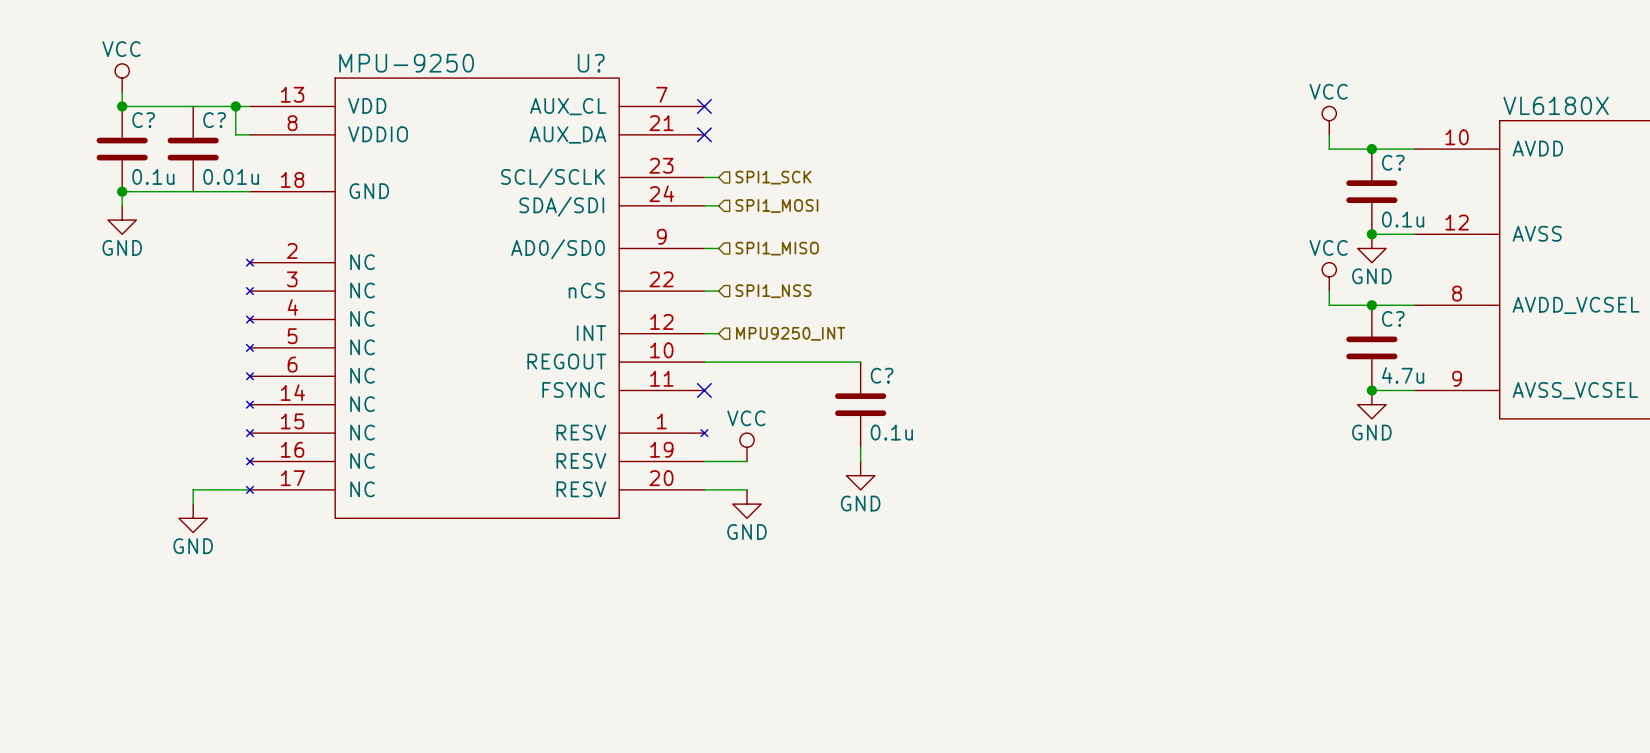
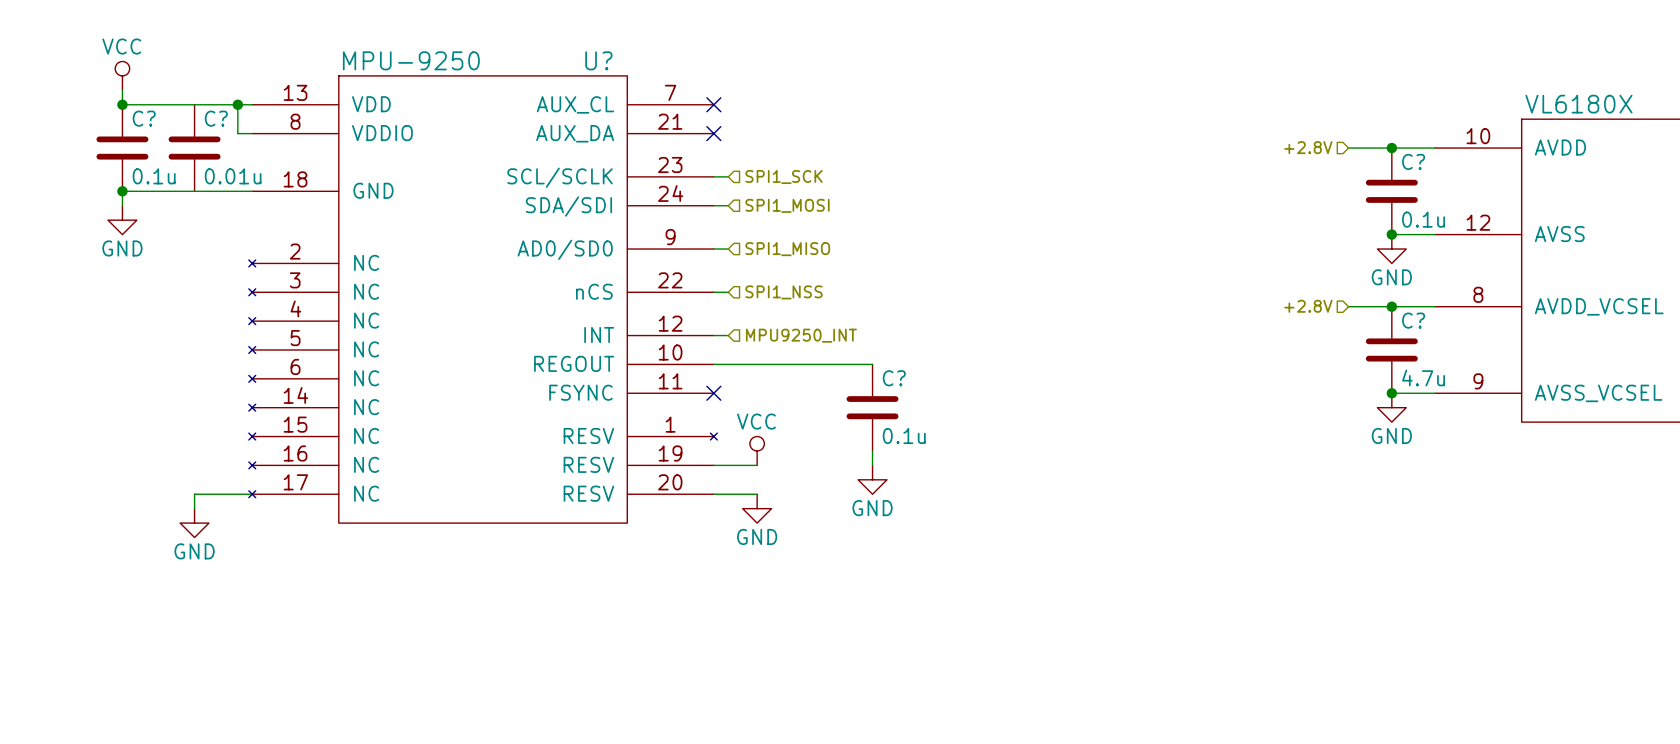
power symbol: VCC (1329, 120) -> none
wire: (1329, 134) (1329, 149) -> none
hierarchical label: none -> +2.8V (1308, 147)
power symbol: VCC (1329, 276) -> none
wire: (1329, 291) (1329, 305) -> none
hierarchical label: none -> +2.8V (1308, 306)

